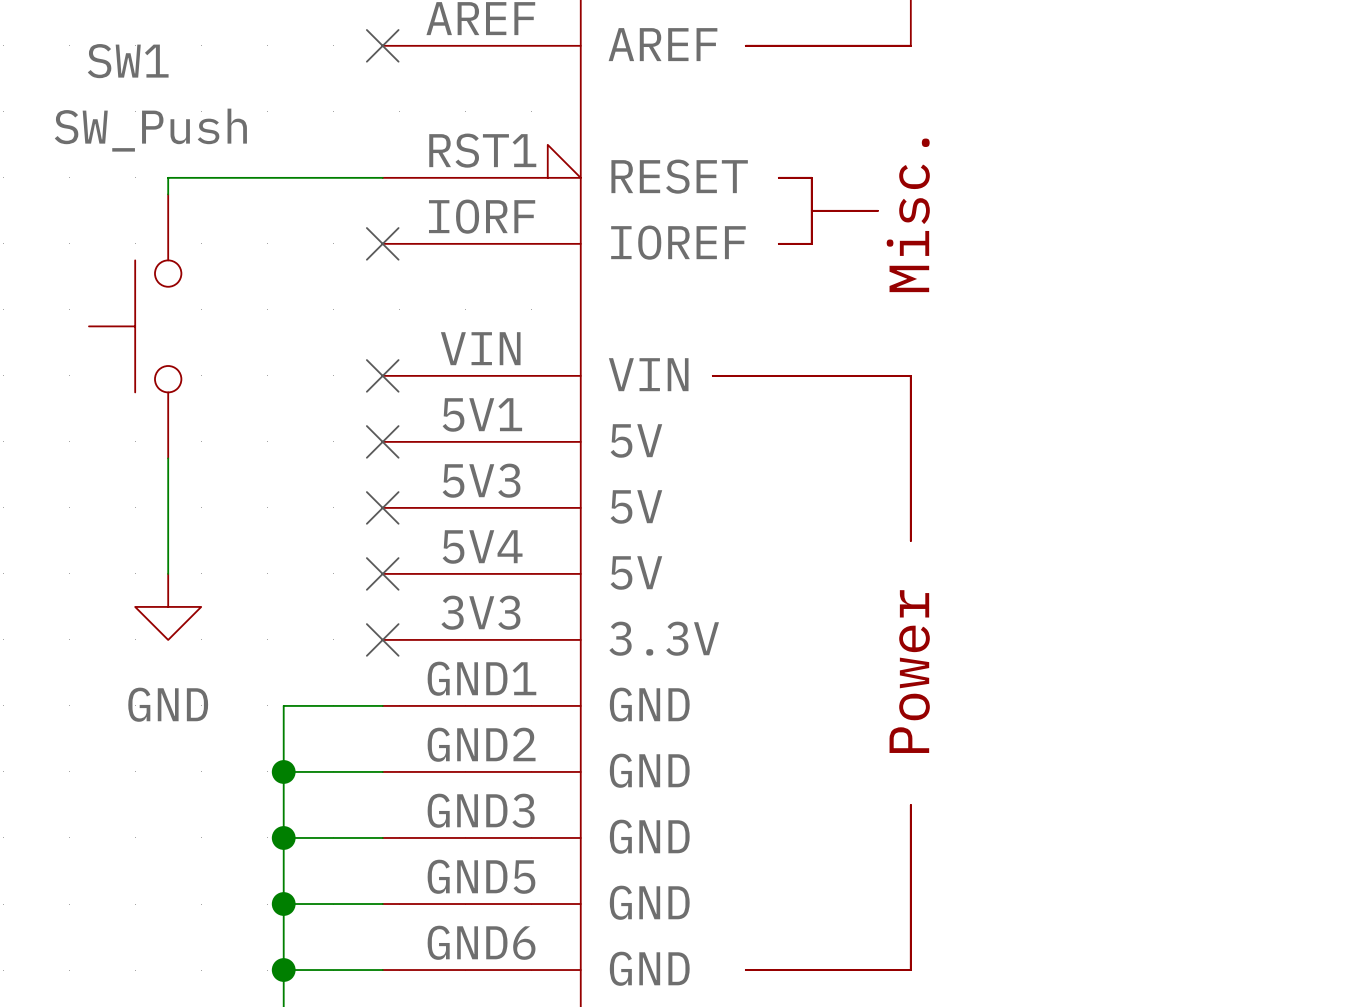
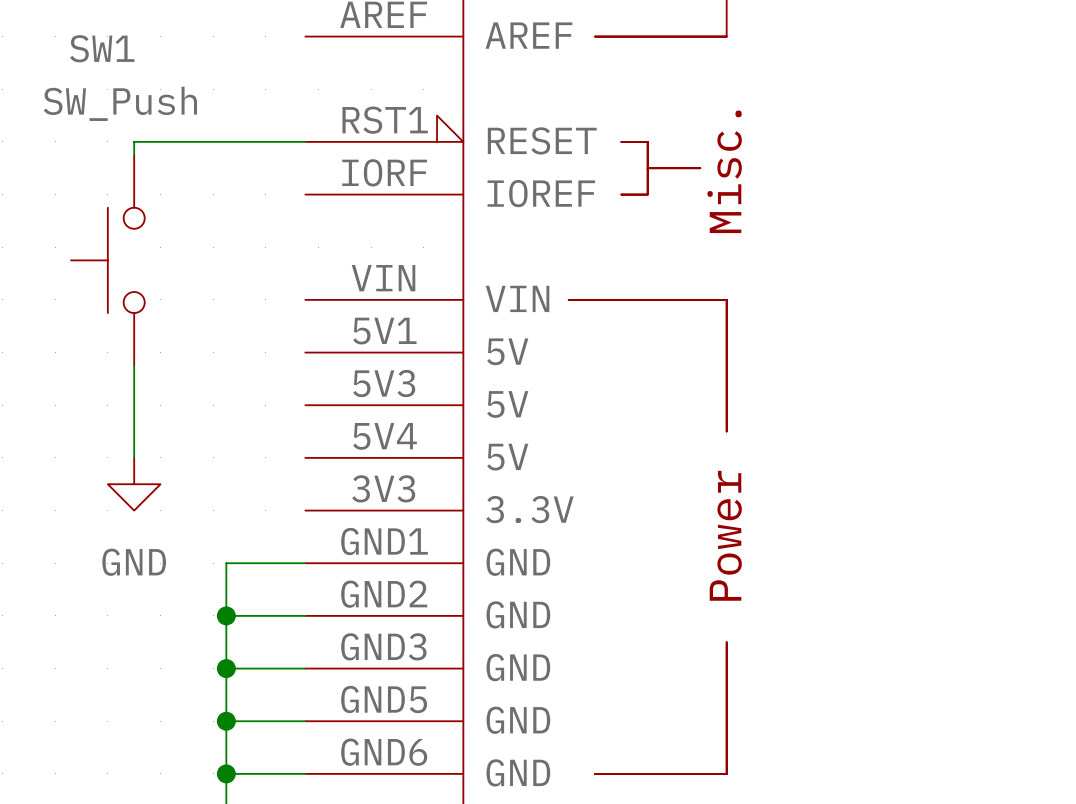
no-connect mark: (382, 45) -> none
no-connect mark: (382, 243) -> none
no-connect mark: (382, 375) -> none
no-connect mark: (382, 441) -> none
no-connect mark: (382, 507) -> none
no-connect mark: (382, 573) -> none
no-connect mark: (382, 639) -> none

